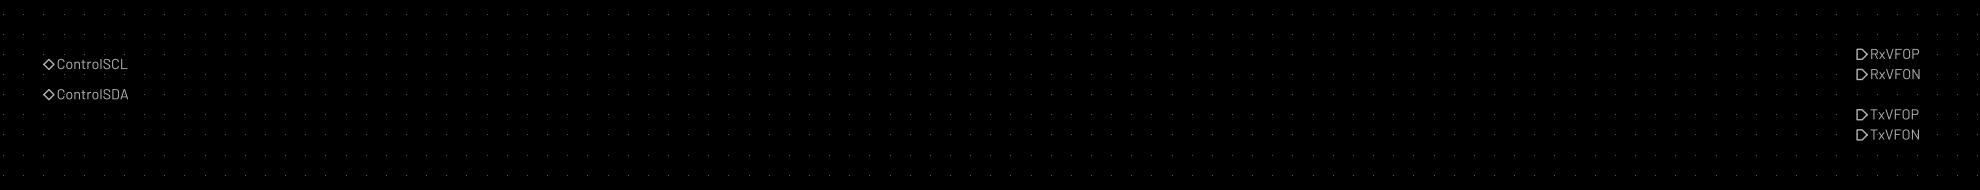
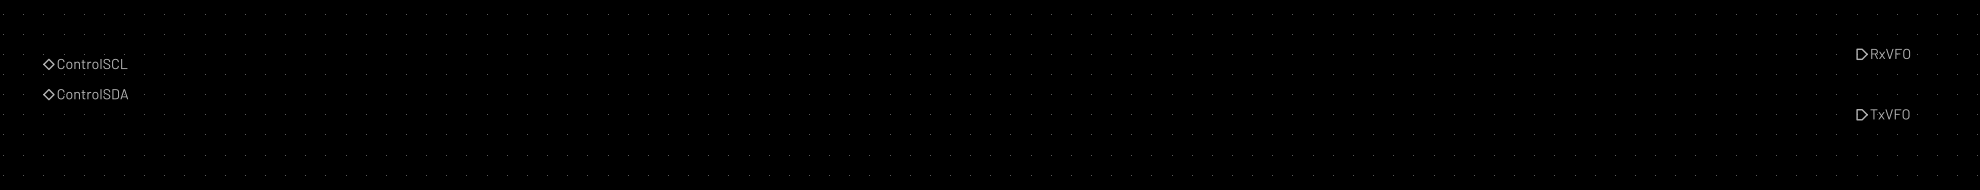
hierarchical label: RxVFOP (1895, 53) -> RxVFO (1890, 53)
hierarchical label: RxVFON (1895, 74) -> none
hierarchical label: TxVFOP (1894, 114) -> TxVFO (1890, 114)
hierarchical label: TxVFON (1894, 134) -> none

